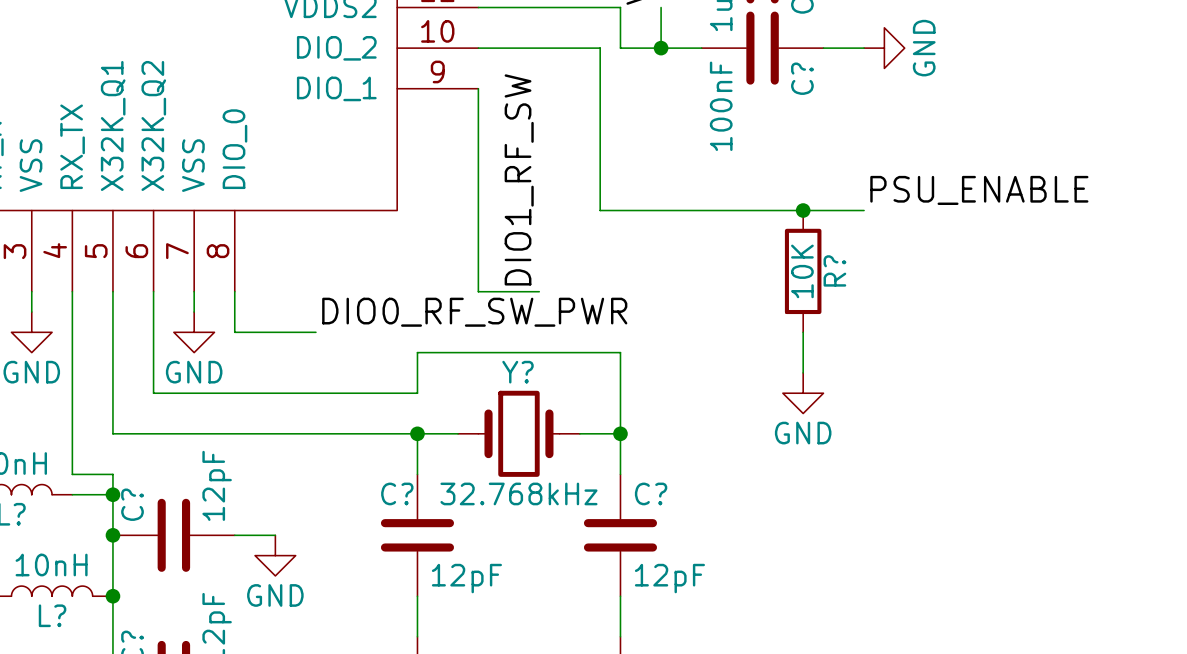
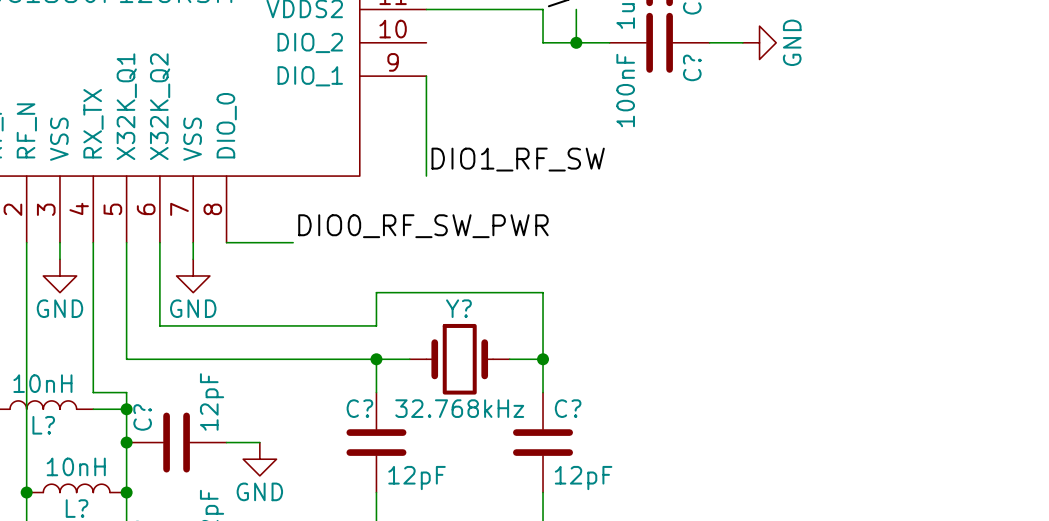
wire: (478, 48) (600, 48) (600, 210) (864, 210) -> none
label rotation: 0° (519, 179) -> 90° clockwise (518, 159)
label: PSU_ENABLE (979, 190) -> none
wire: (478, 210) (478, 291) (539, 291) -> none
junction: (803, 210) -> none
R?: 10K (803, 271) -> none
wire: (234, 291) (234, 332) (315, 332) -> (226, 242) (293, 242)
label position: DIO0_RF_SW_PWR (474, 312) -> DIO0_RF_SW_PWR (423, 226)
wire: (803, 332) (803, 372) -> none
power symbol: GND (803, 393) -> none

